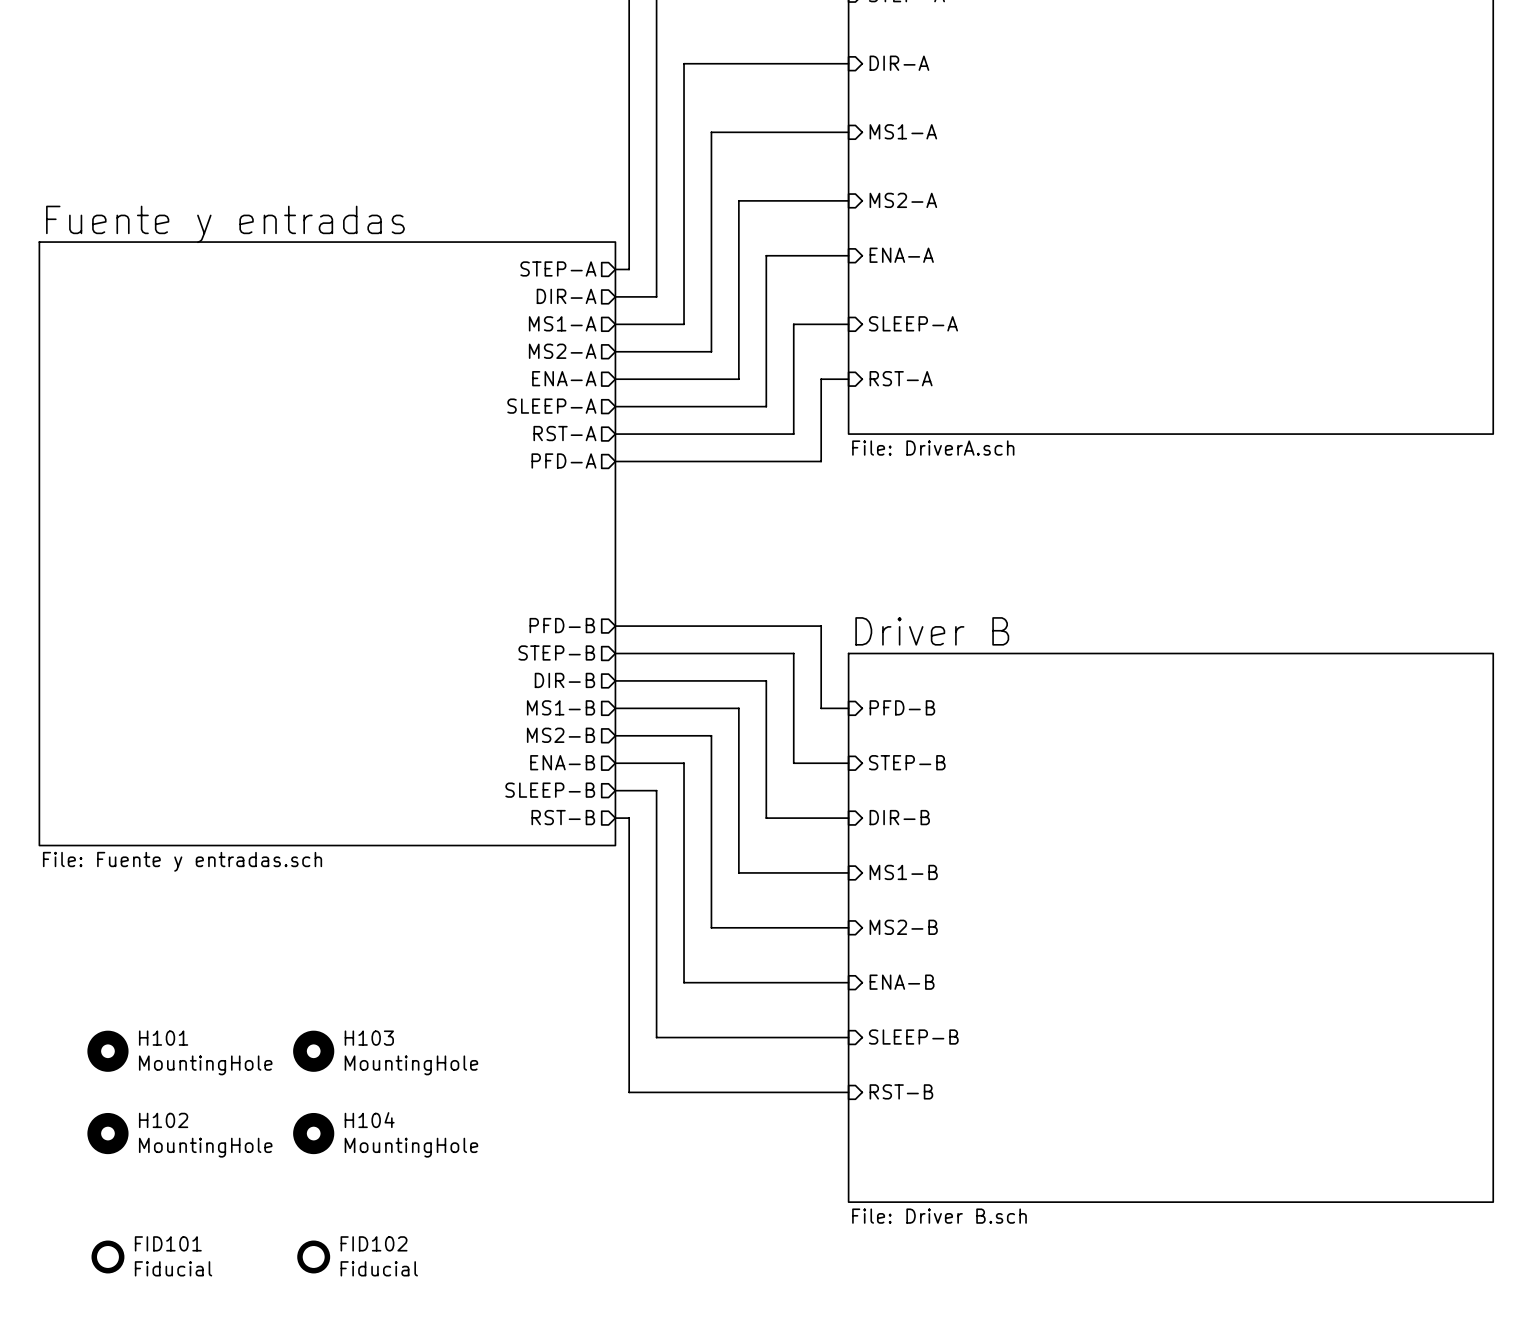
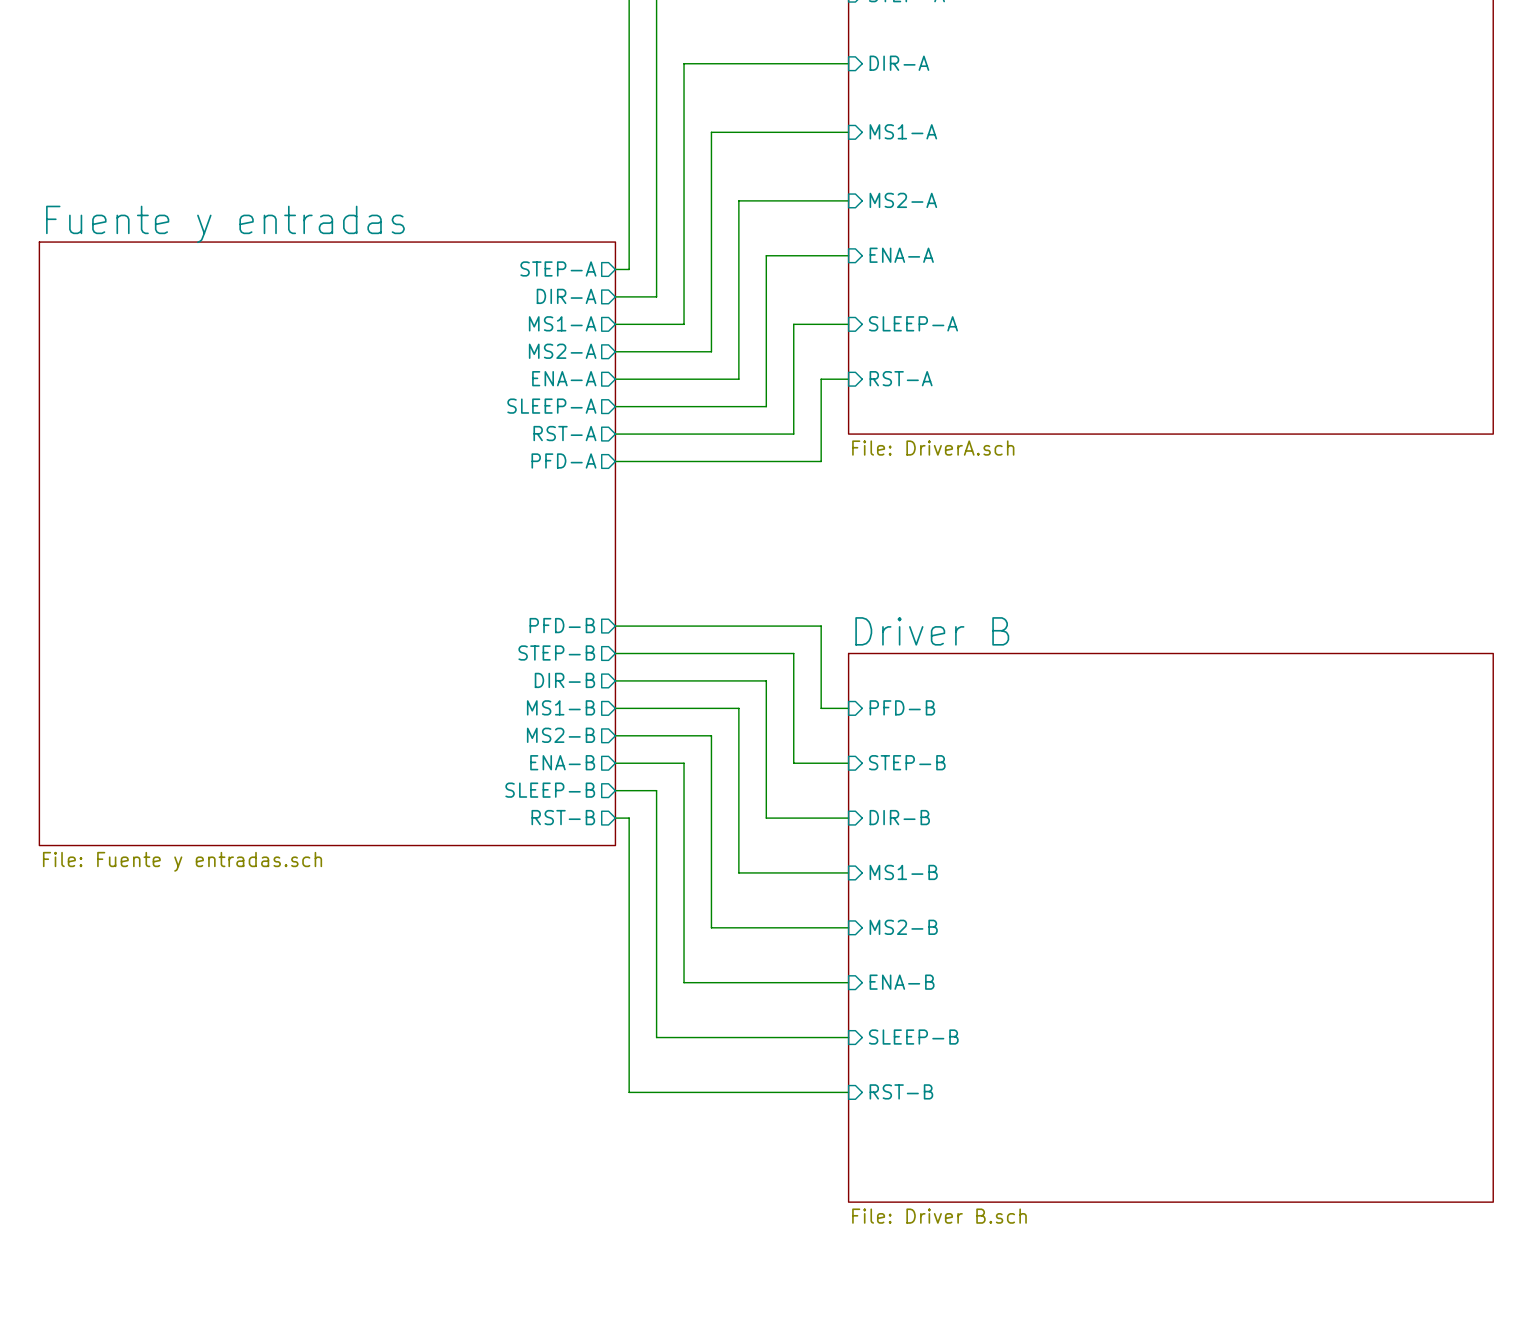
H101: MountingHole (107, 1051) -> none
H103: MountingHole (313, 1051) -> none
H102: MountingHole (107, 1133) -> none
H104: MountingHole (313, 1133) -> none
FID101: Fiducial (107, 1256) -> none
FID102: Fiducial (313, 1256) -> none

